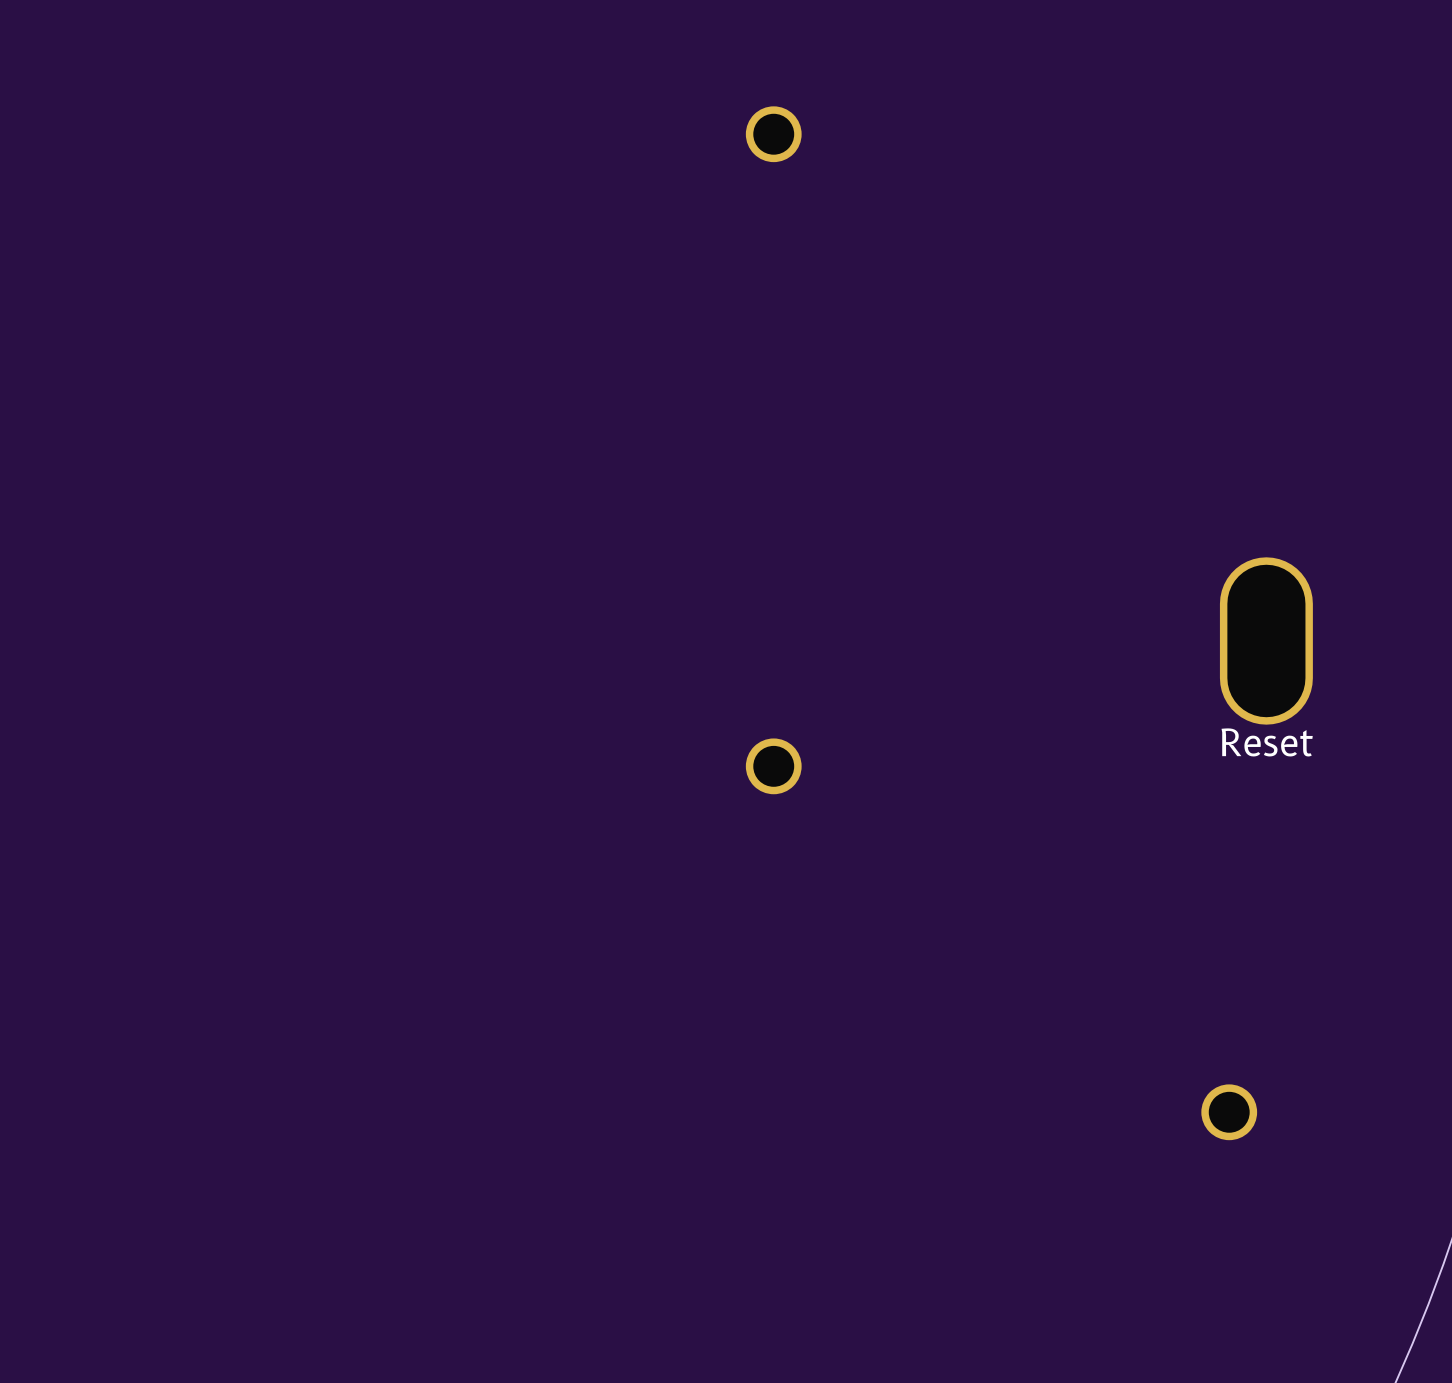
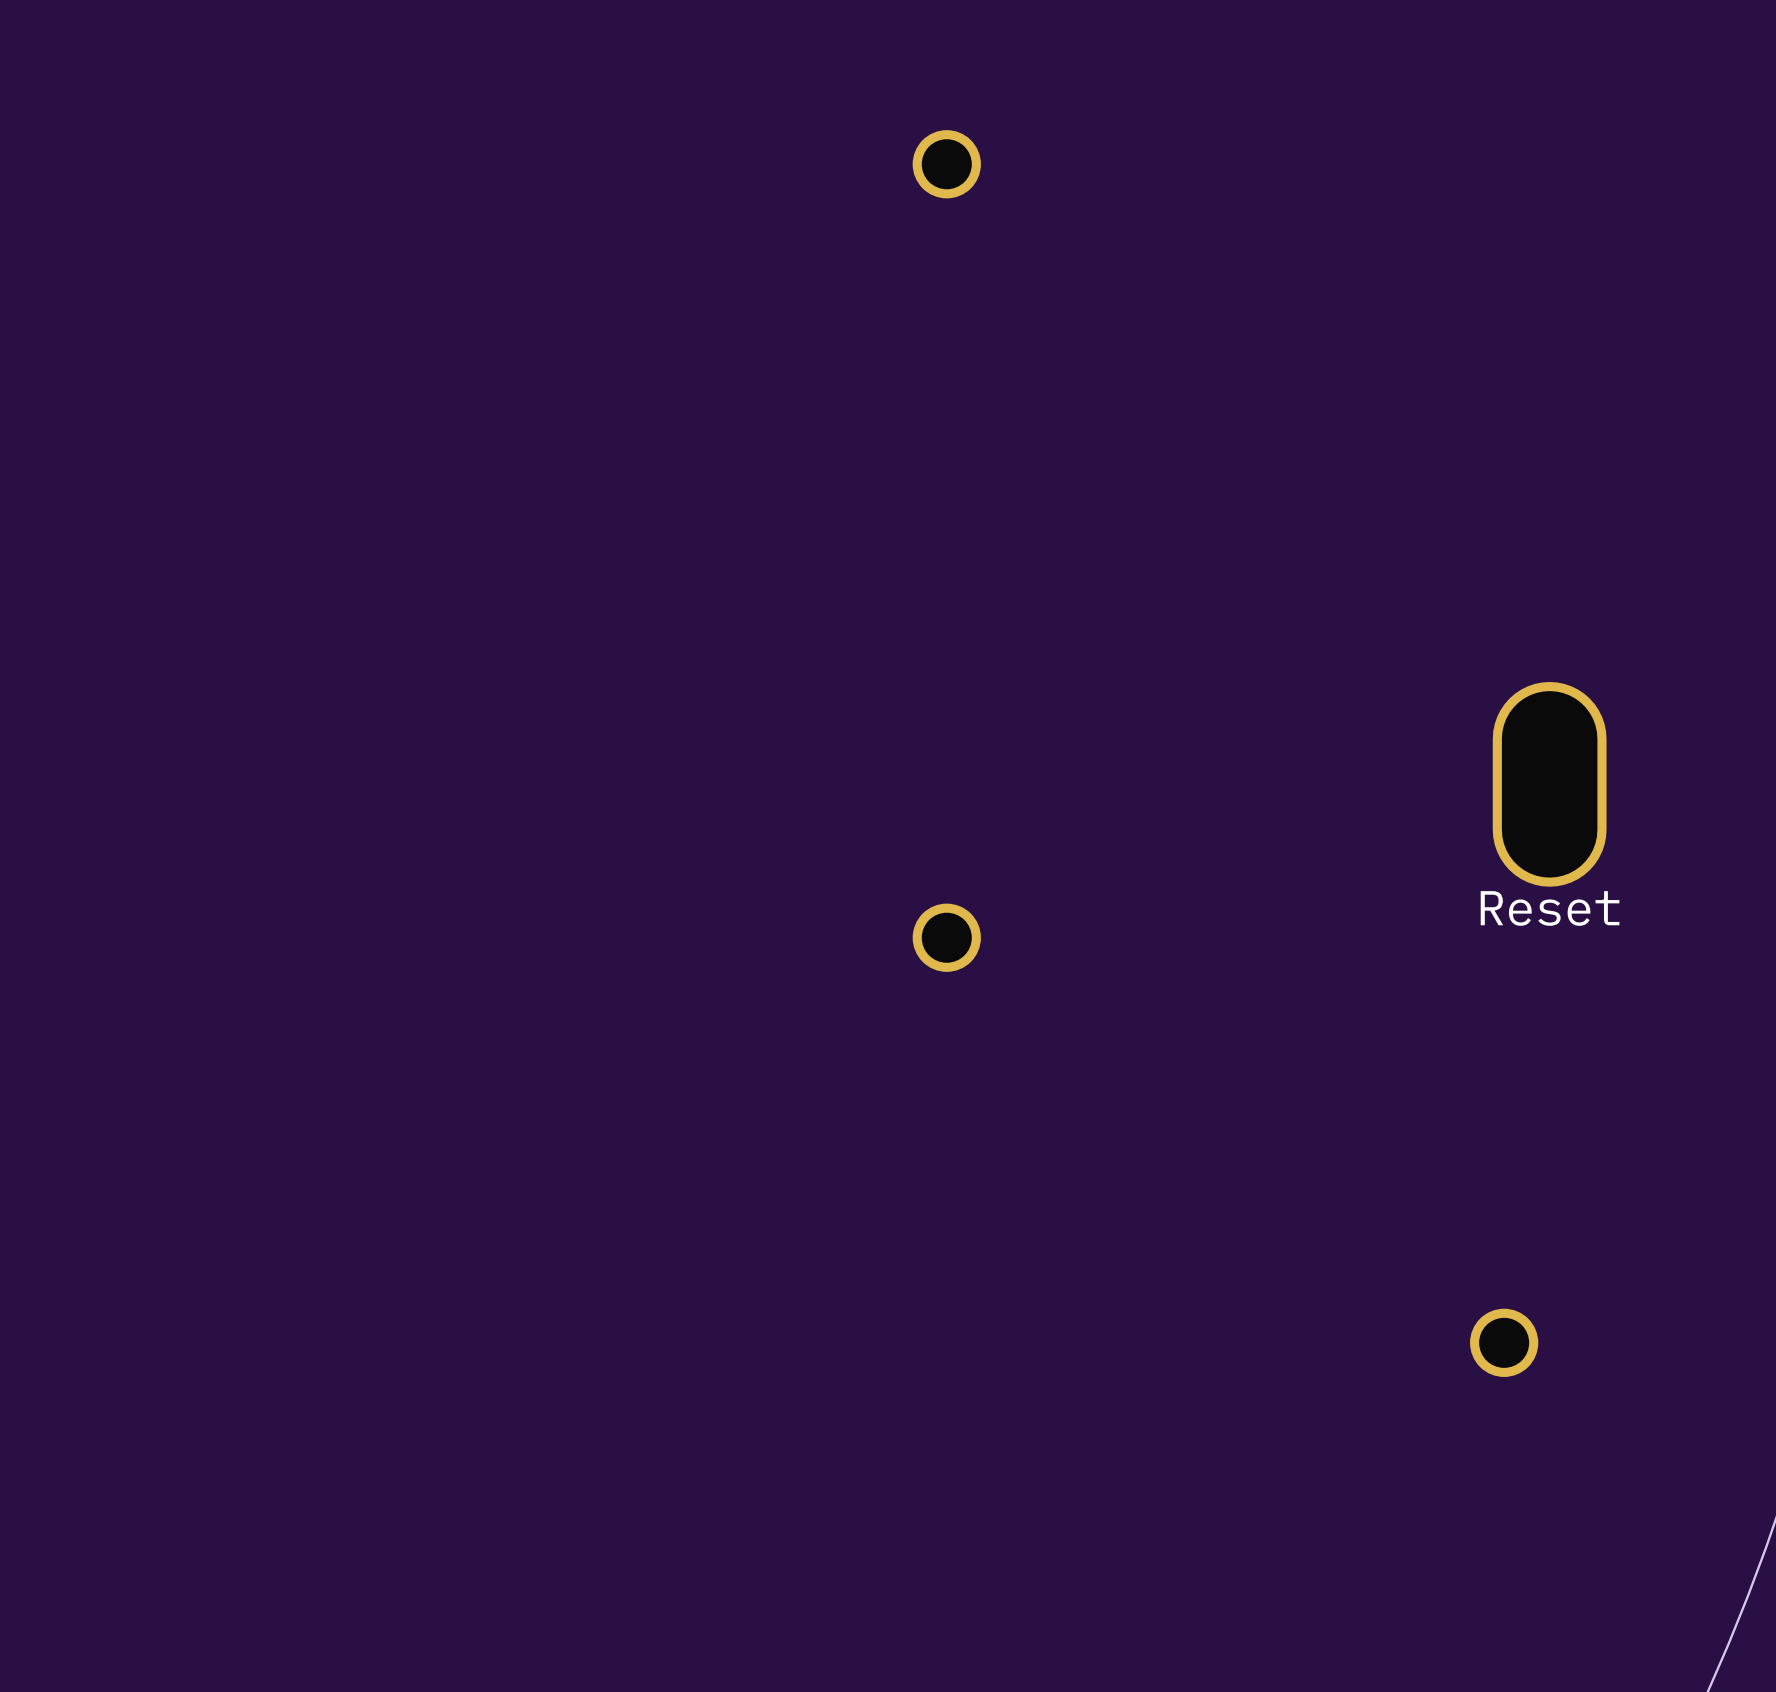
part position: (1229, 1112) -> (1504, 1342)

